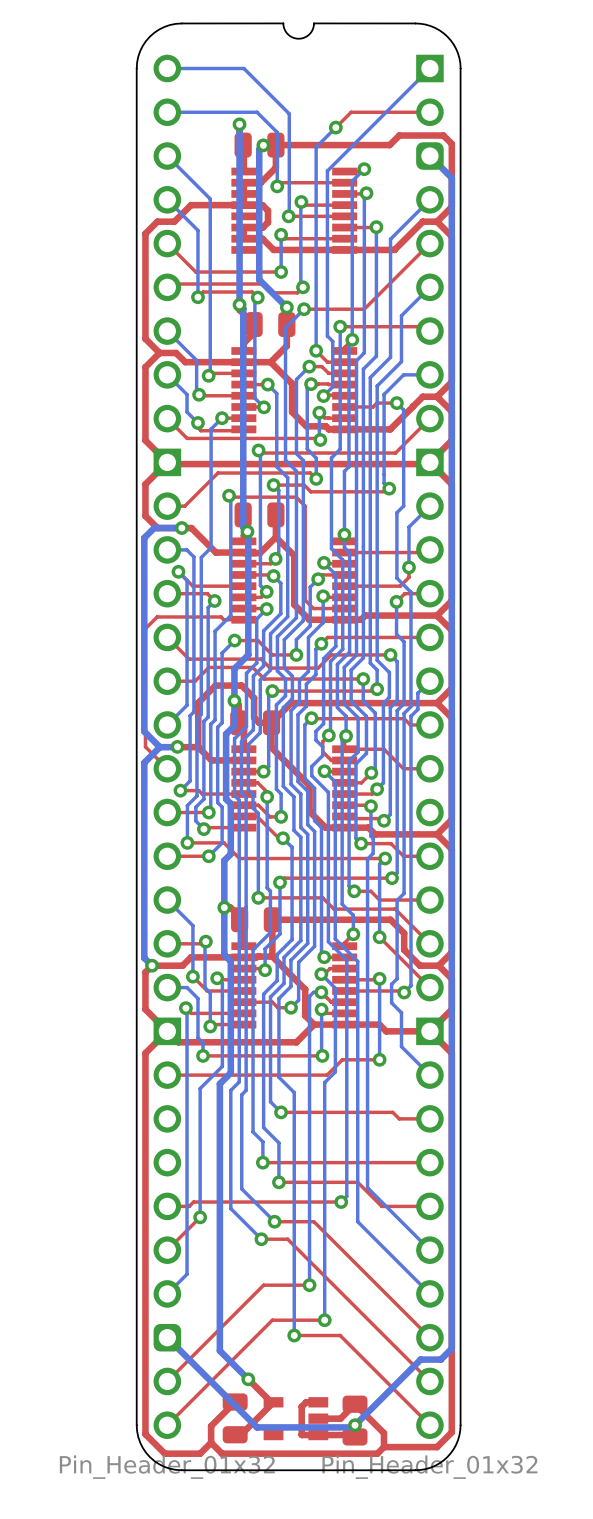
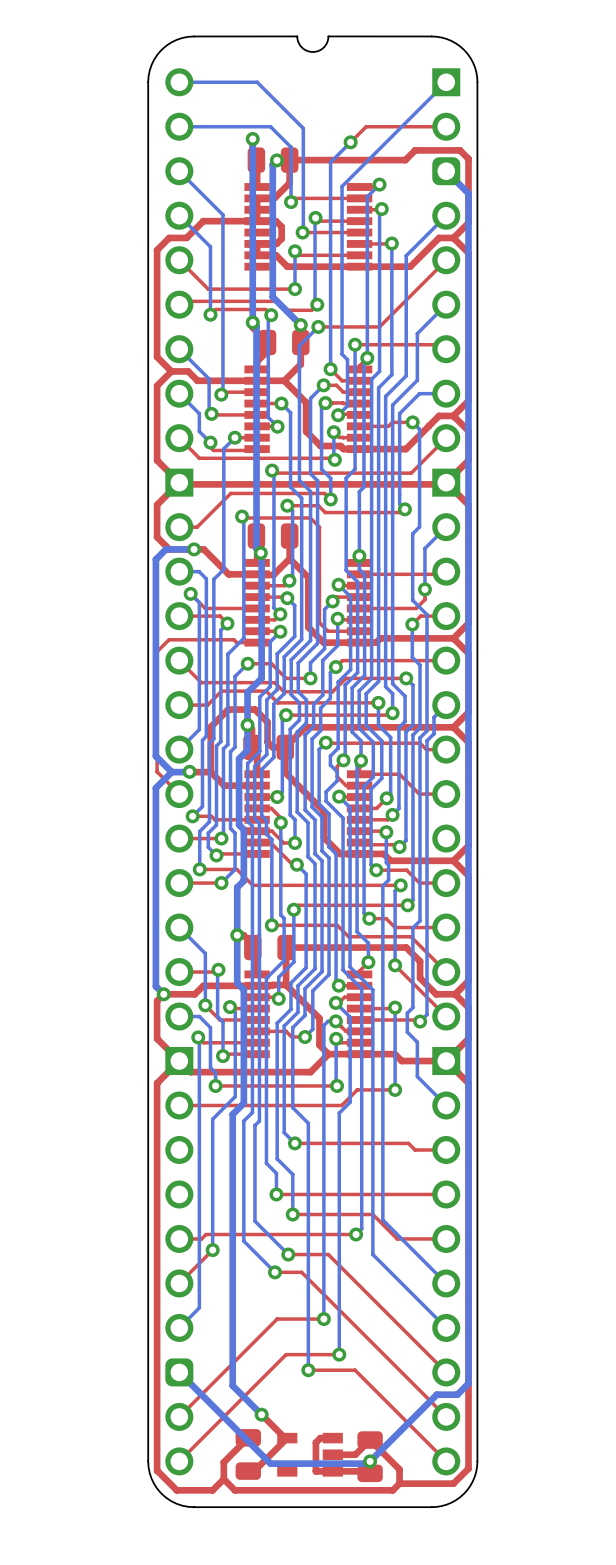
drawing: [59, 1455, 538, 1479] -> none

